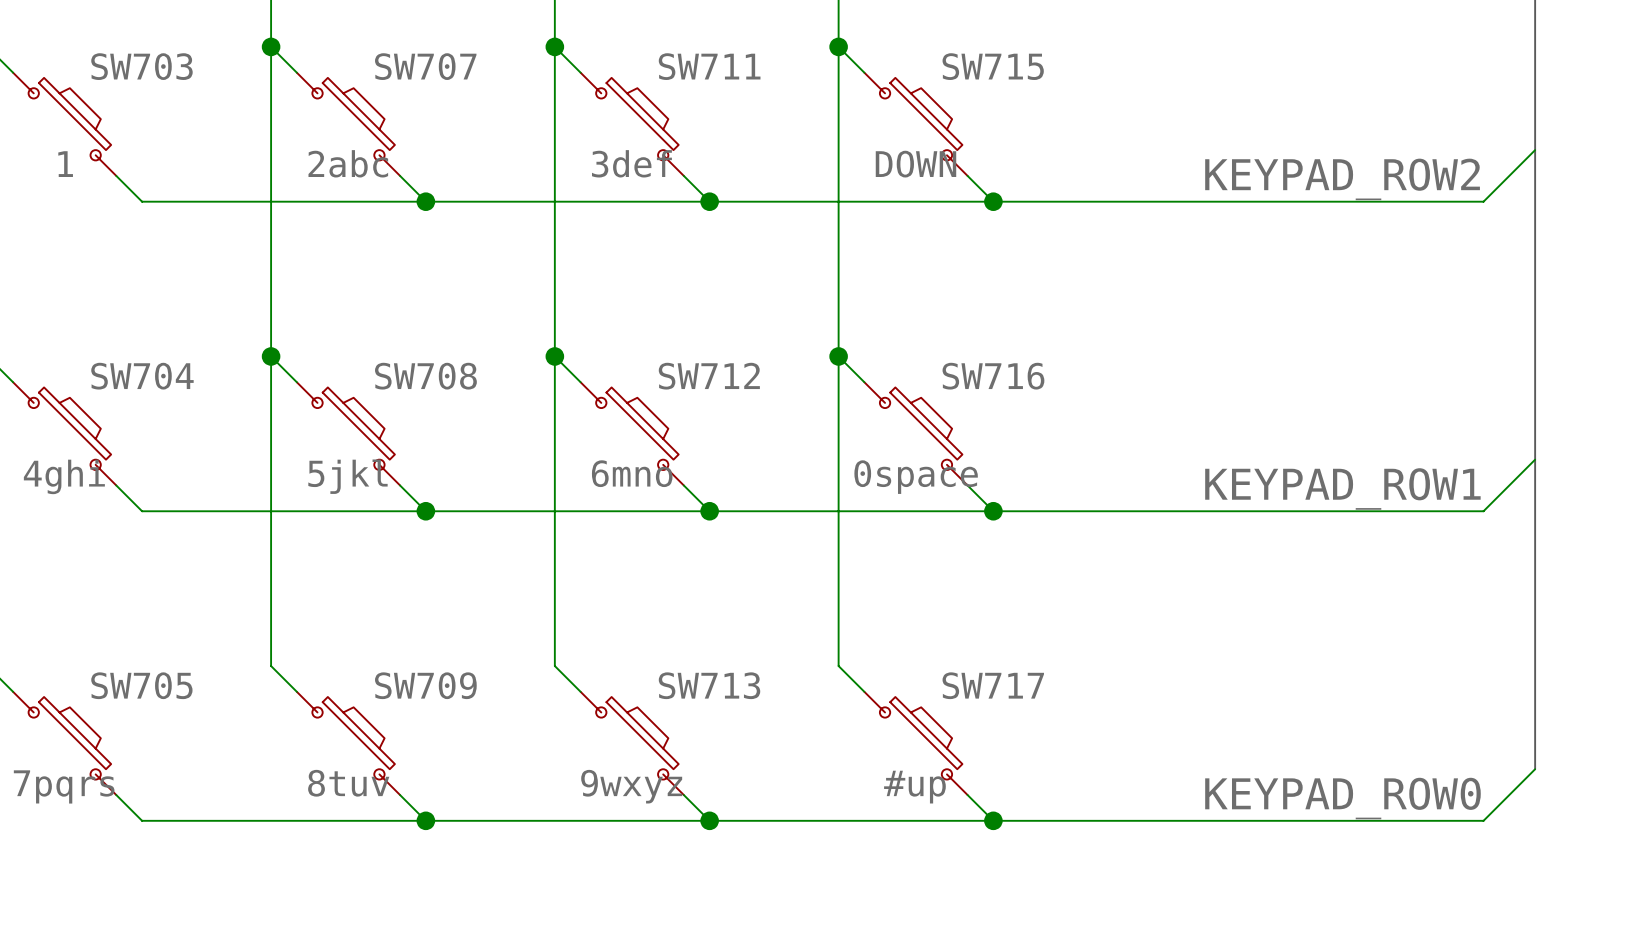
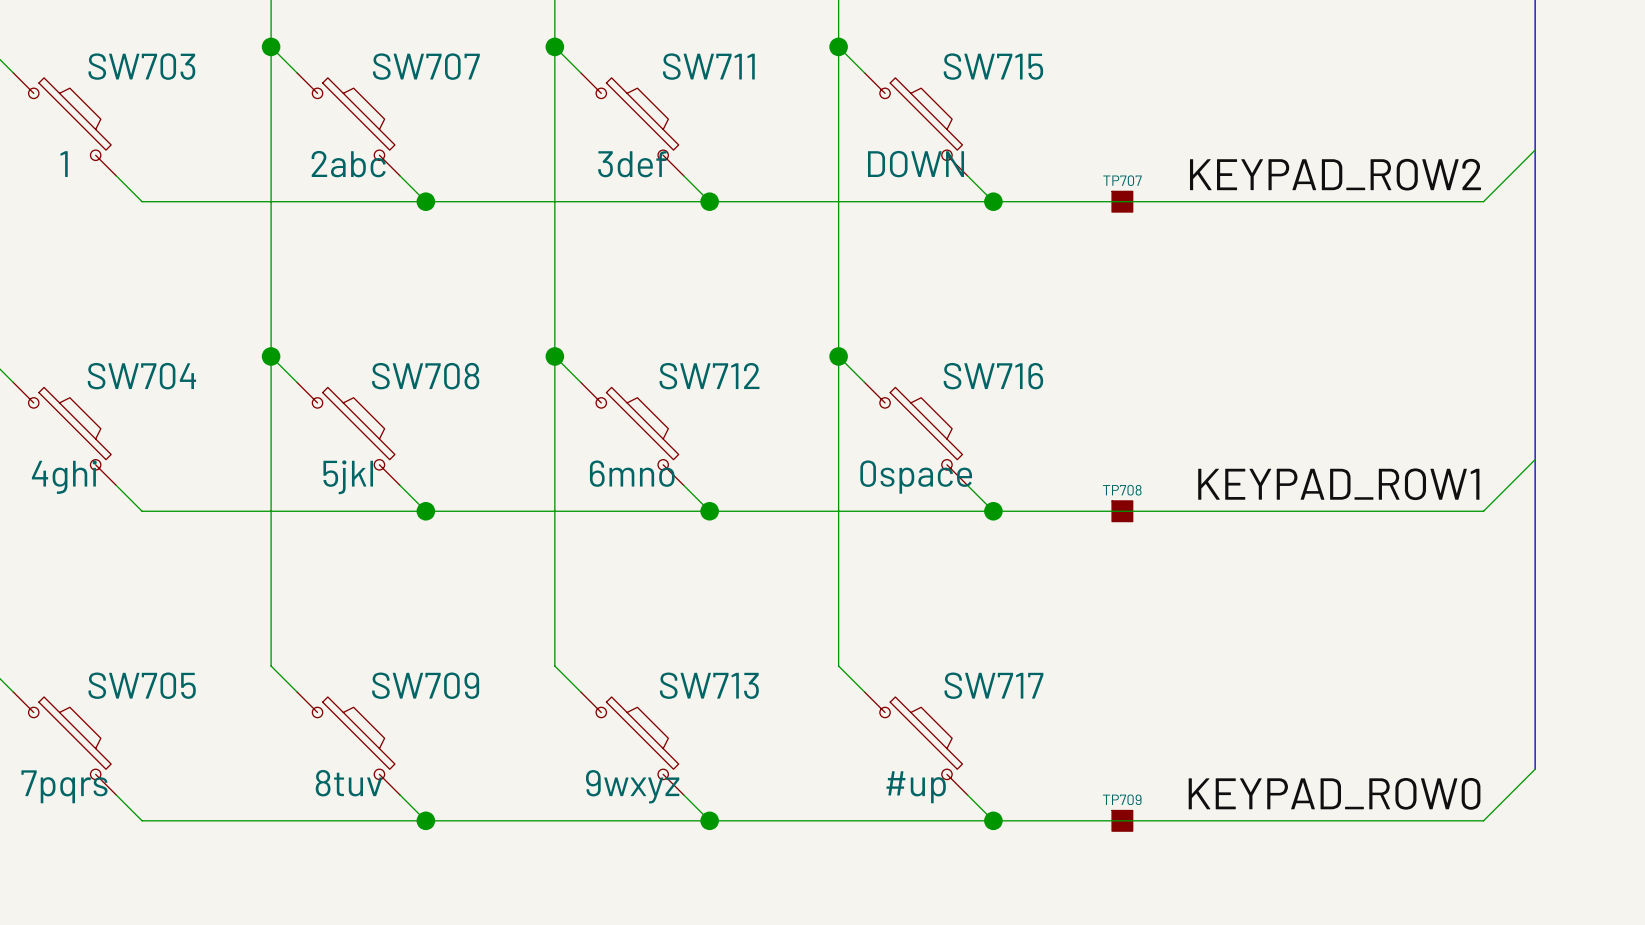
TP707: none -> (1122, 201)
TP708: none -> (1122, 511)
TP709: none -> (1122, 820)

